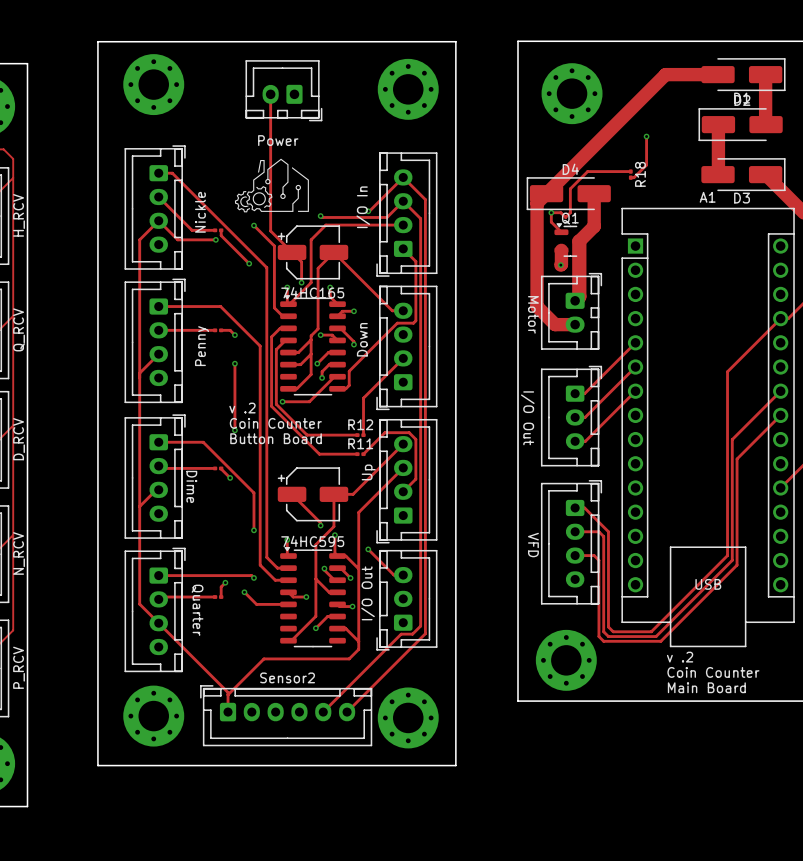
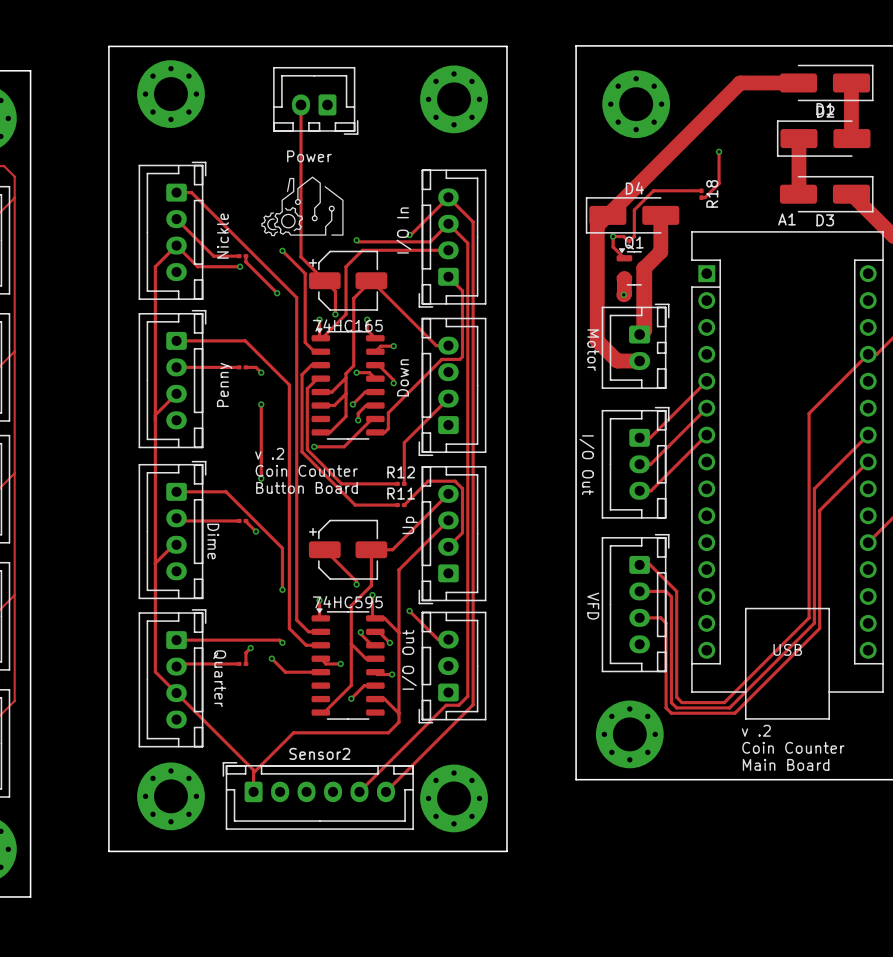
part value: H_RCV (19, 215) -> none
part value: Q_RCV (19, 329) -> none
part value: D_RCV (19, 439) -> none
part value: N_RCV (19, 553) -> none
part value: P_RCV (19, 667) -> none

